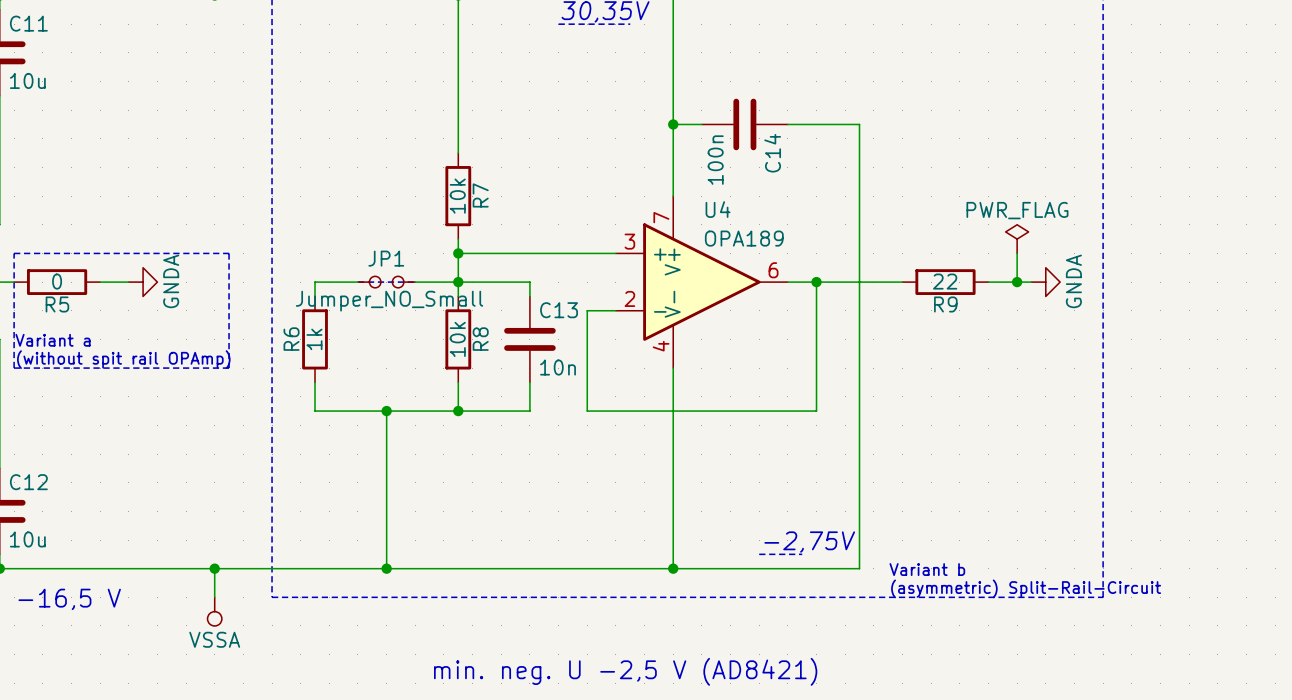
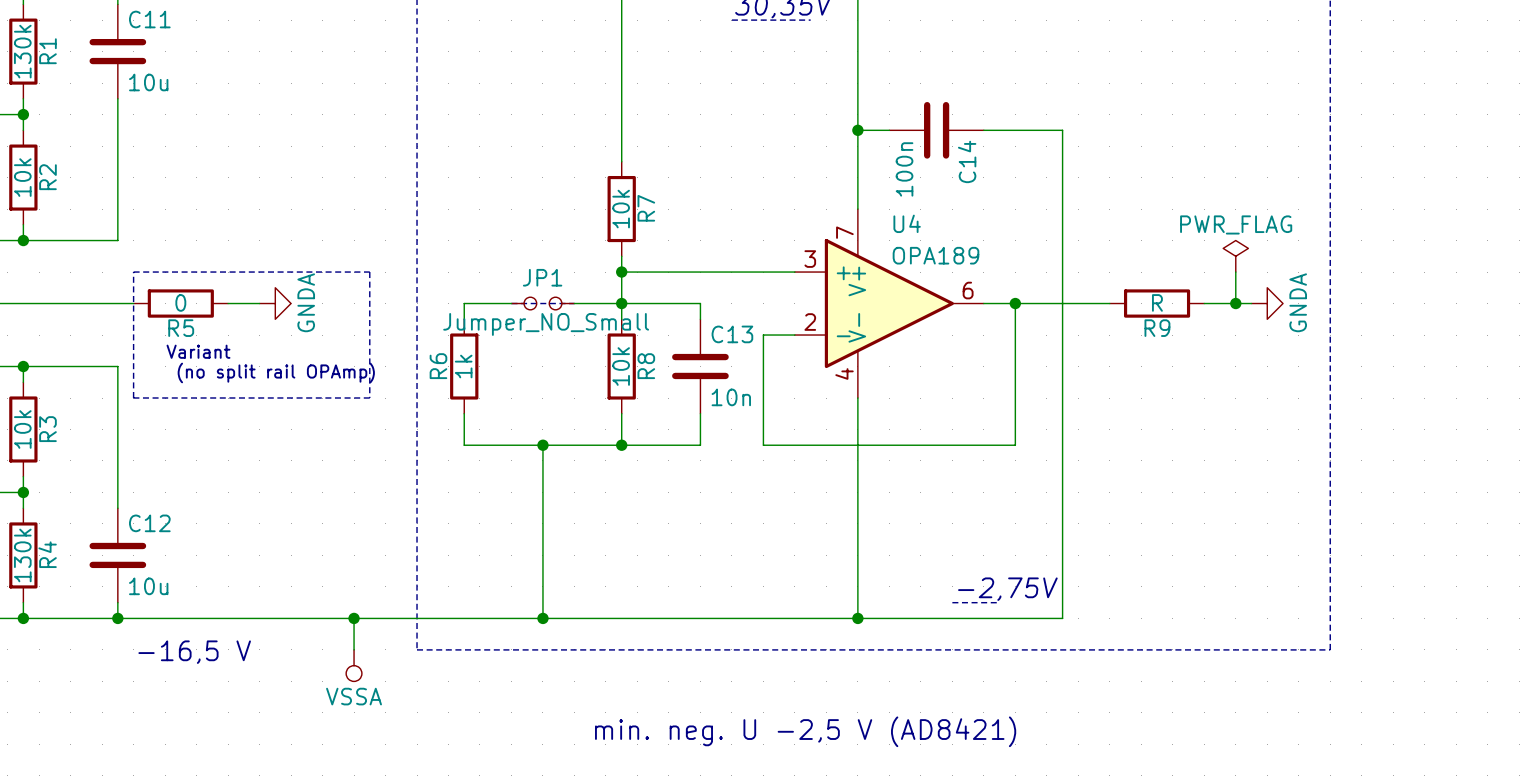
R9 value: 22 (945, 281) -> R (1157, 302)
text: Variant a (53, 340) -> Variant (198, 351)
text: (without spit rail OPAmp) (123, 359) -> (no split rail OPAmp) (276, 372)
text: Variant b (927, 569) -> none
text: (asymmetric) Split-Rail-Circuit (1026, 588) -> none

